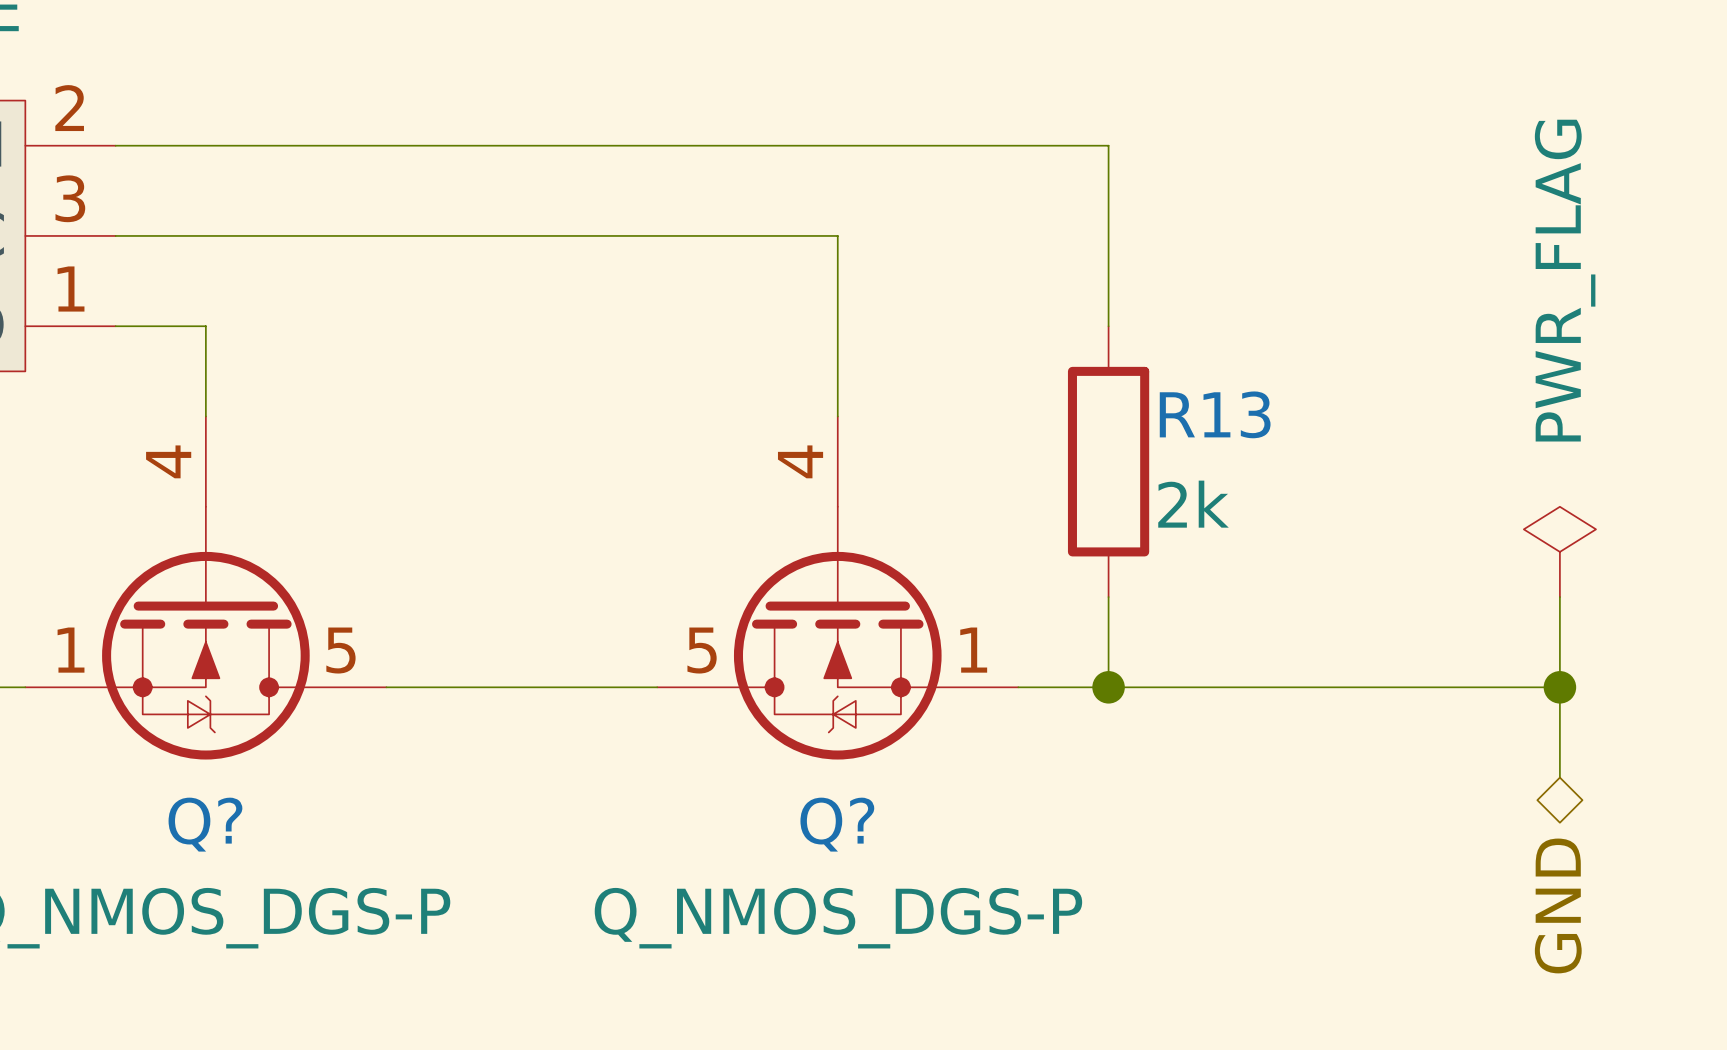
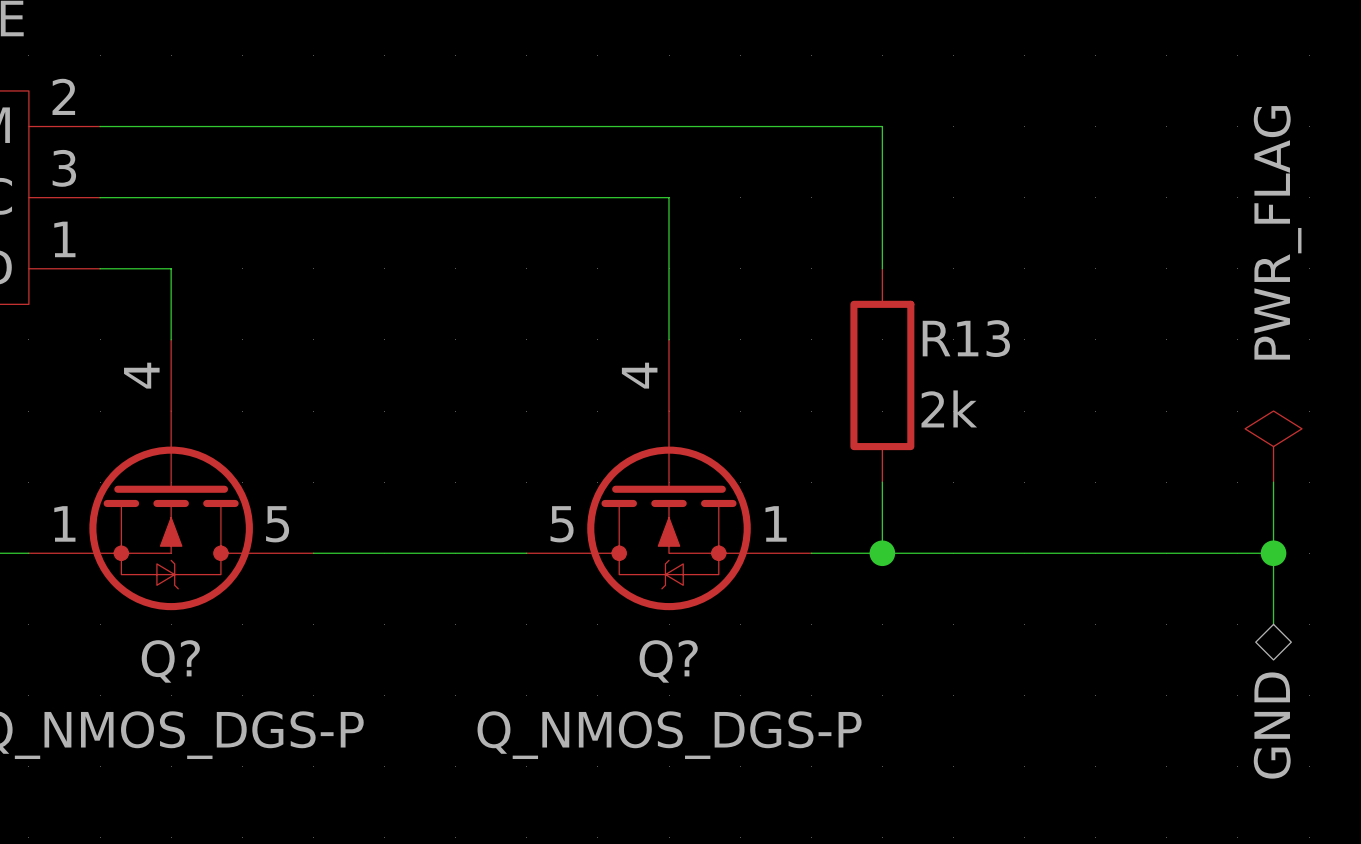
power symbol position: PWR_FLAG (1559, 551) -> PWR_FLAG (1273, 446)
wire: (1559, 597) (1559, 777) -> (1273, 482) (1273, 624)
wire: none -> (1237, 553) (1273, 553)
junction position: (1559, 687) -> (1273, 553)
hierarchical label position: GND (1558, 905) -> GND (1272, 725)

